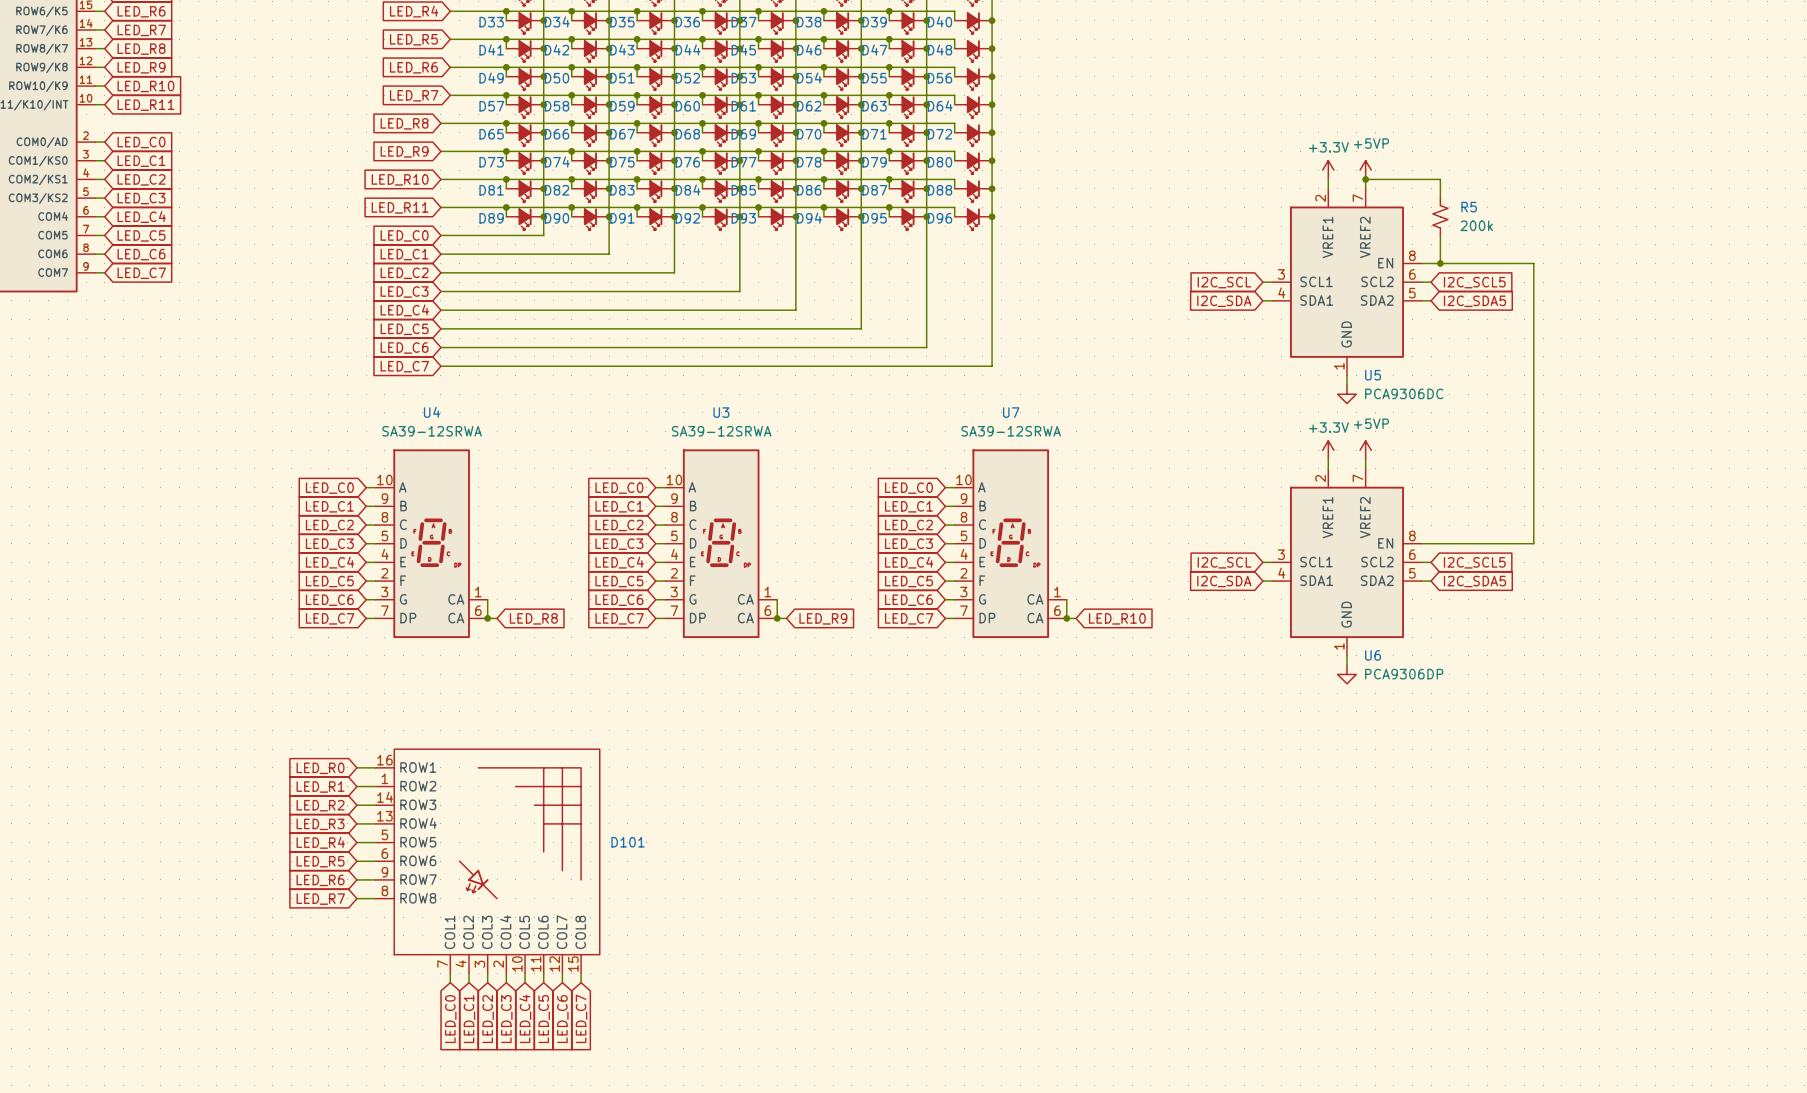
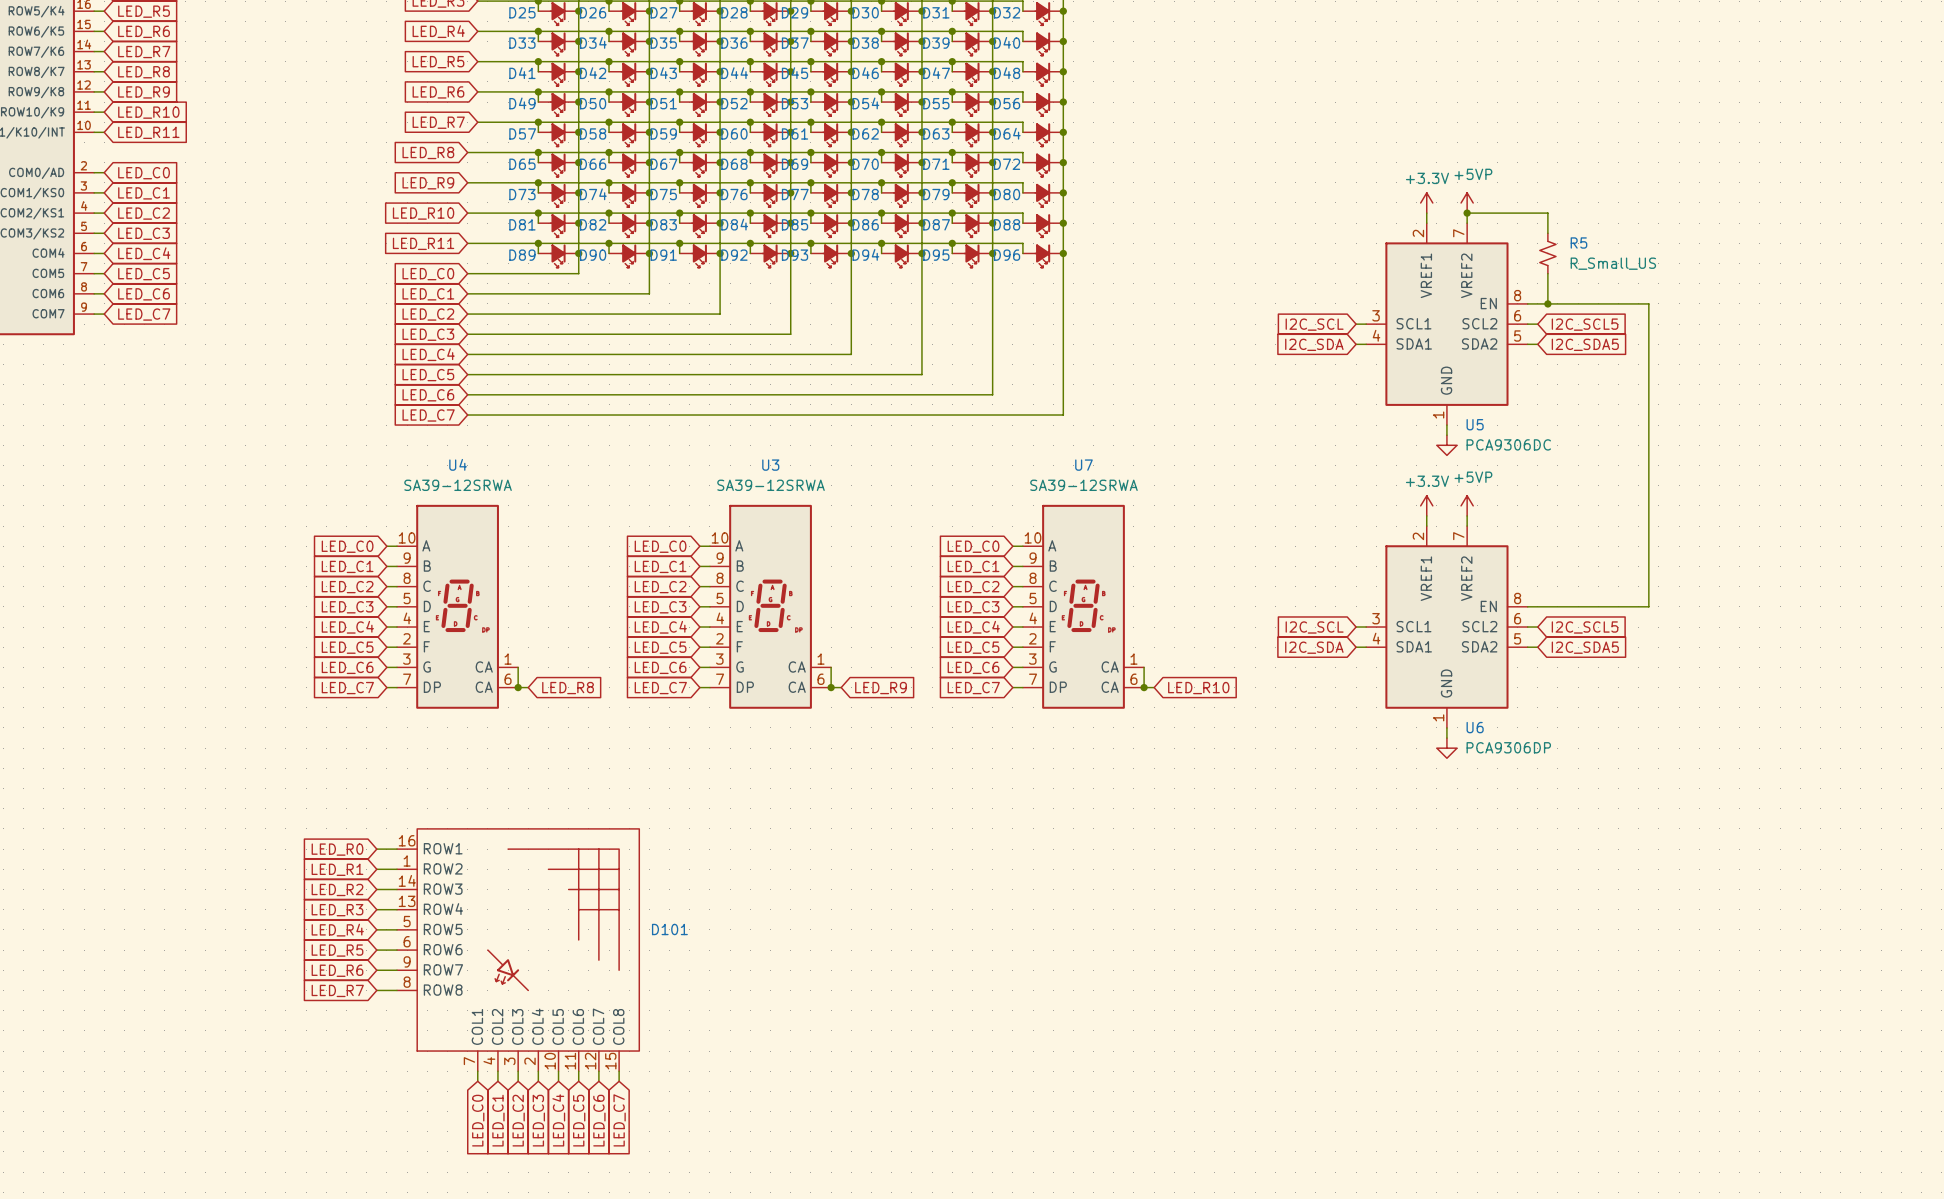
R5 value: 200k (1476, 225) -> R_Small_US (1613, 263)

